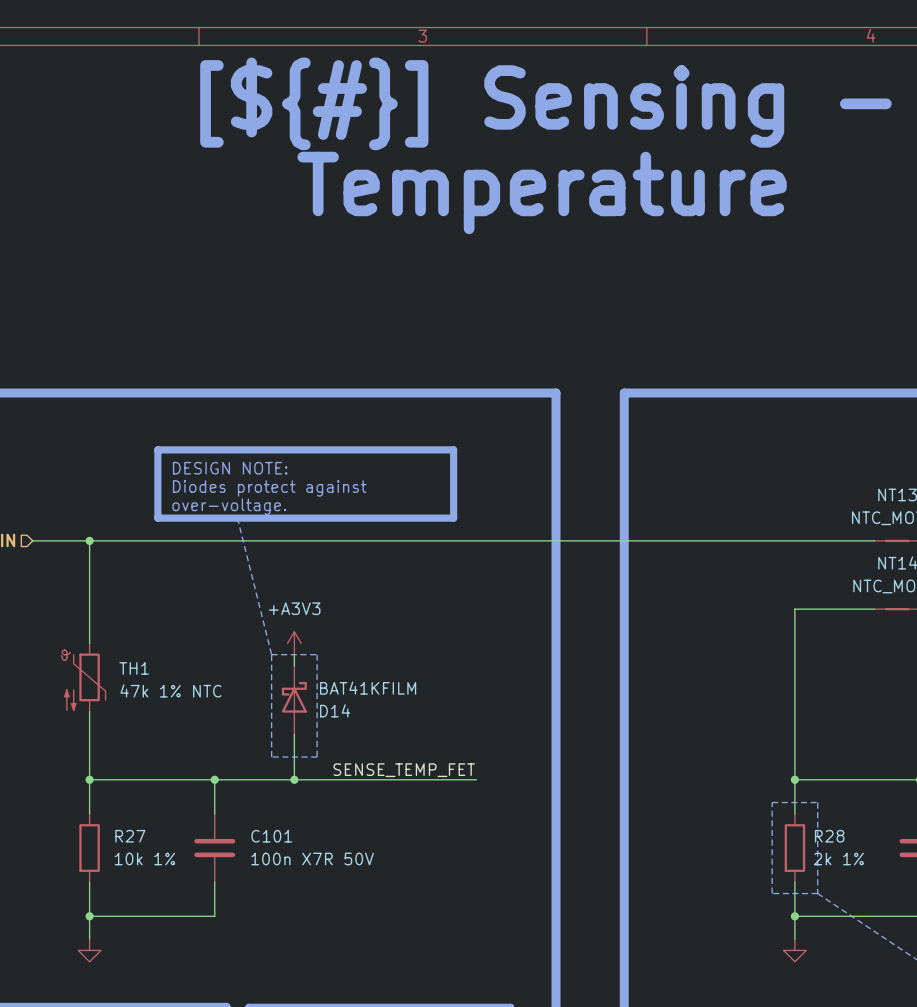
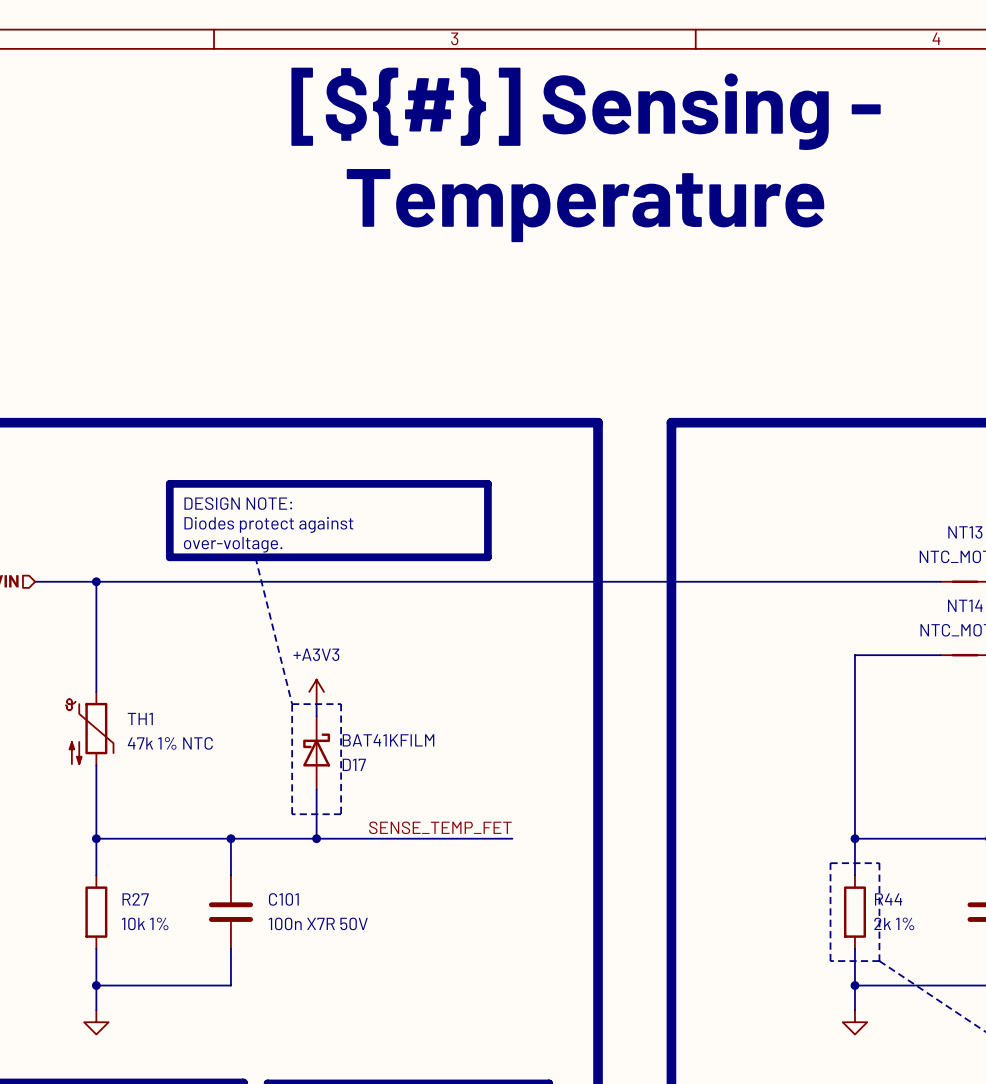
D14 name: D14 (335, 710) -> D17 (354, 764)
R28 name: R28 (829, 836) -> R44 (888, 899)

